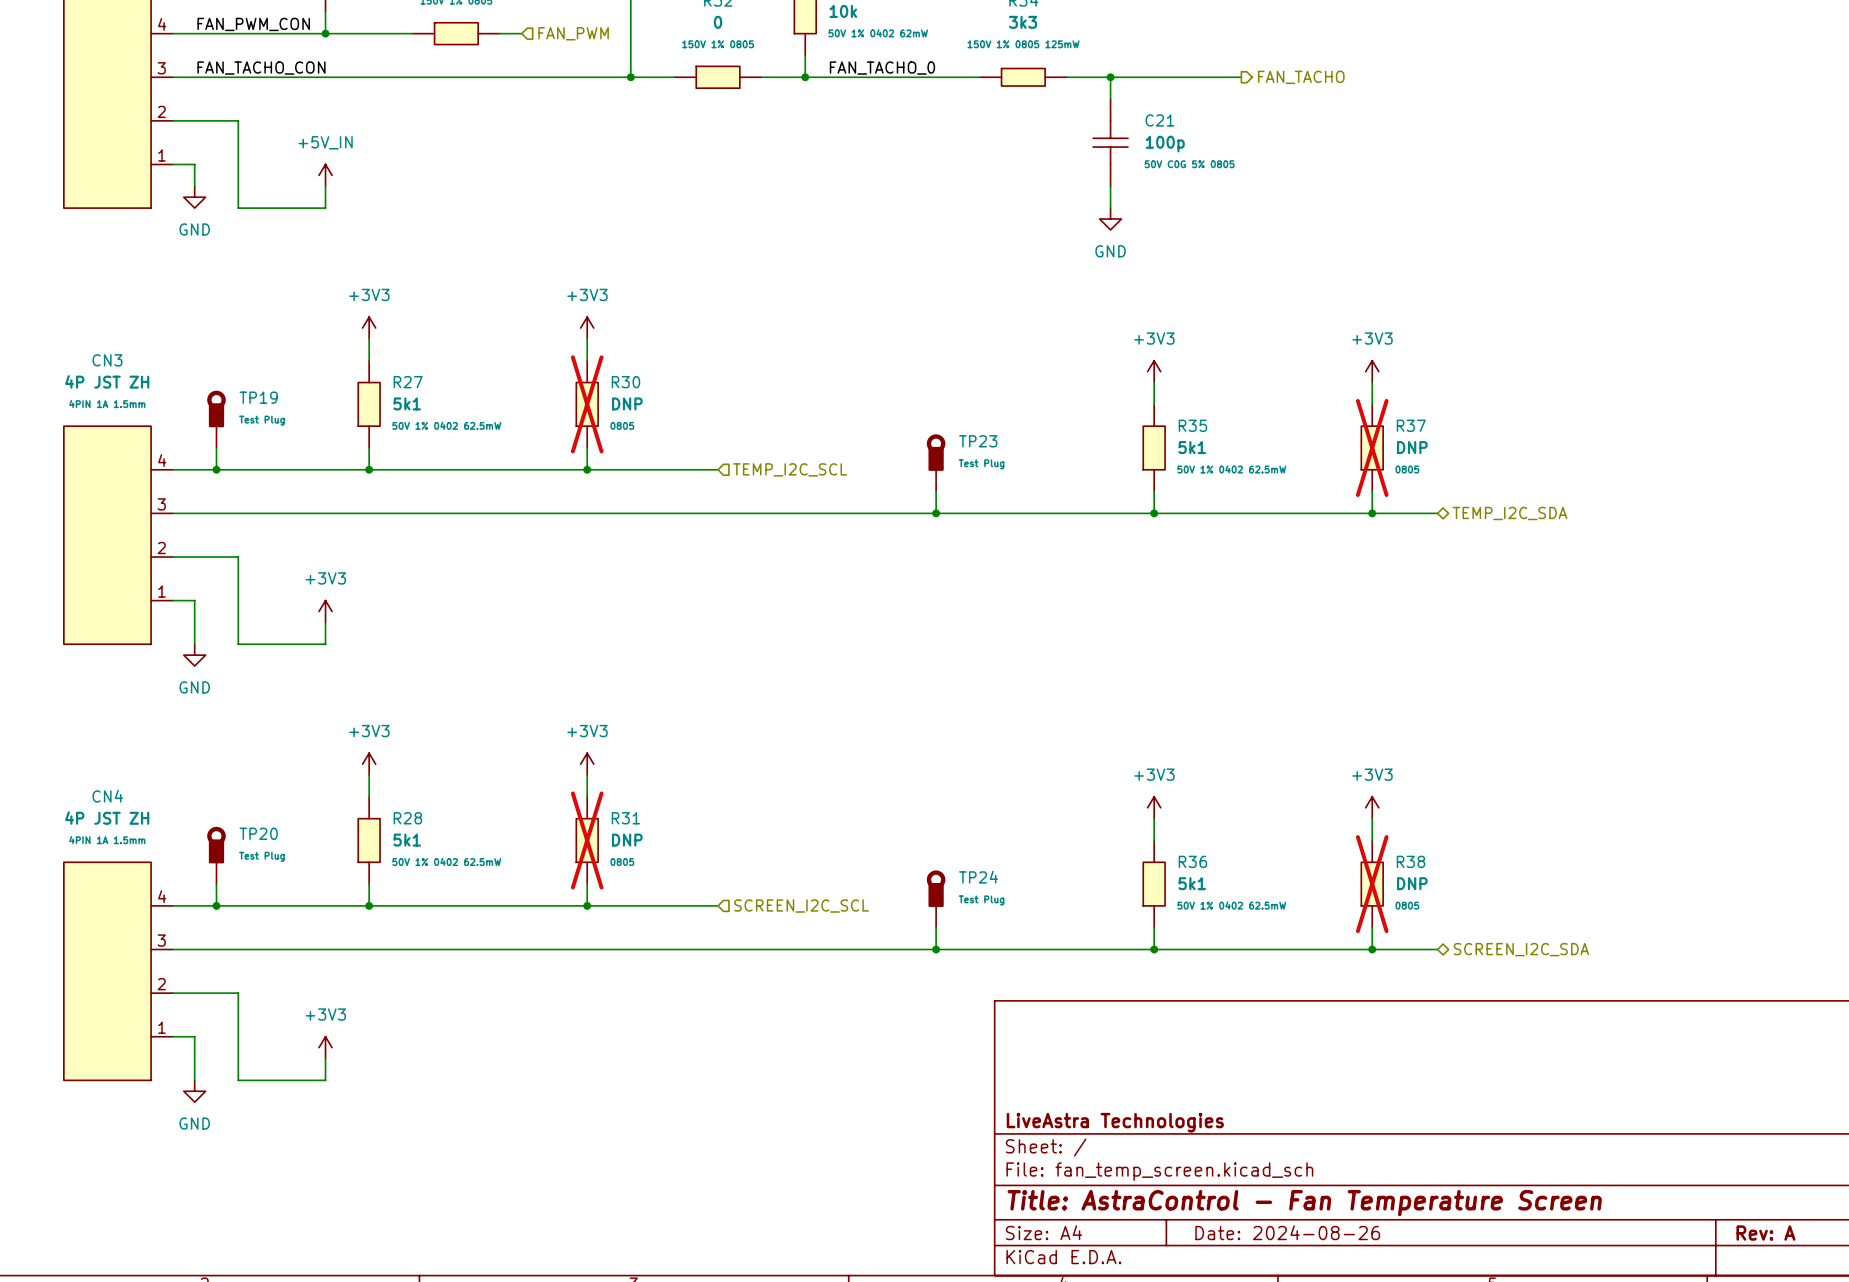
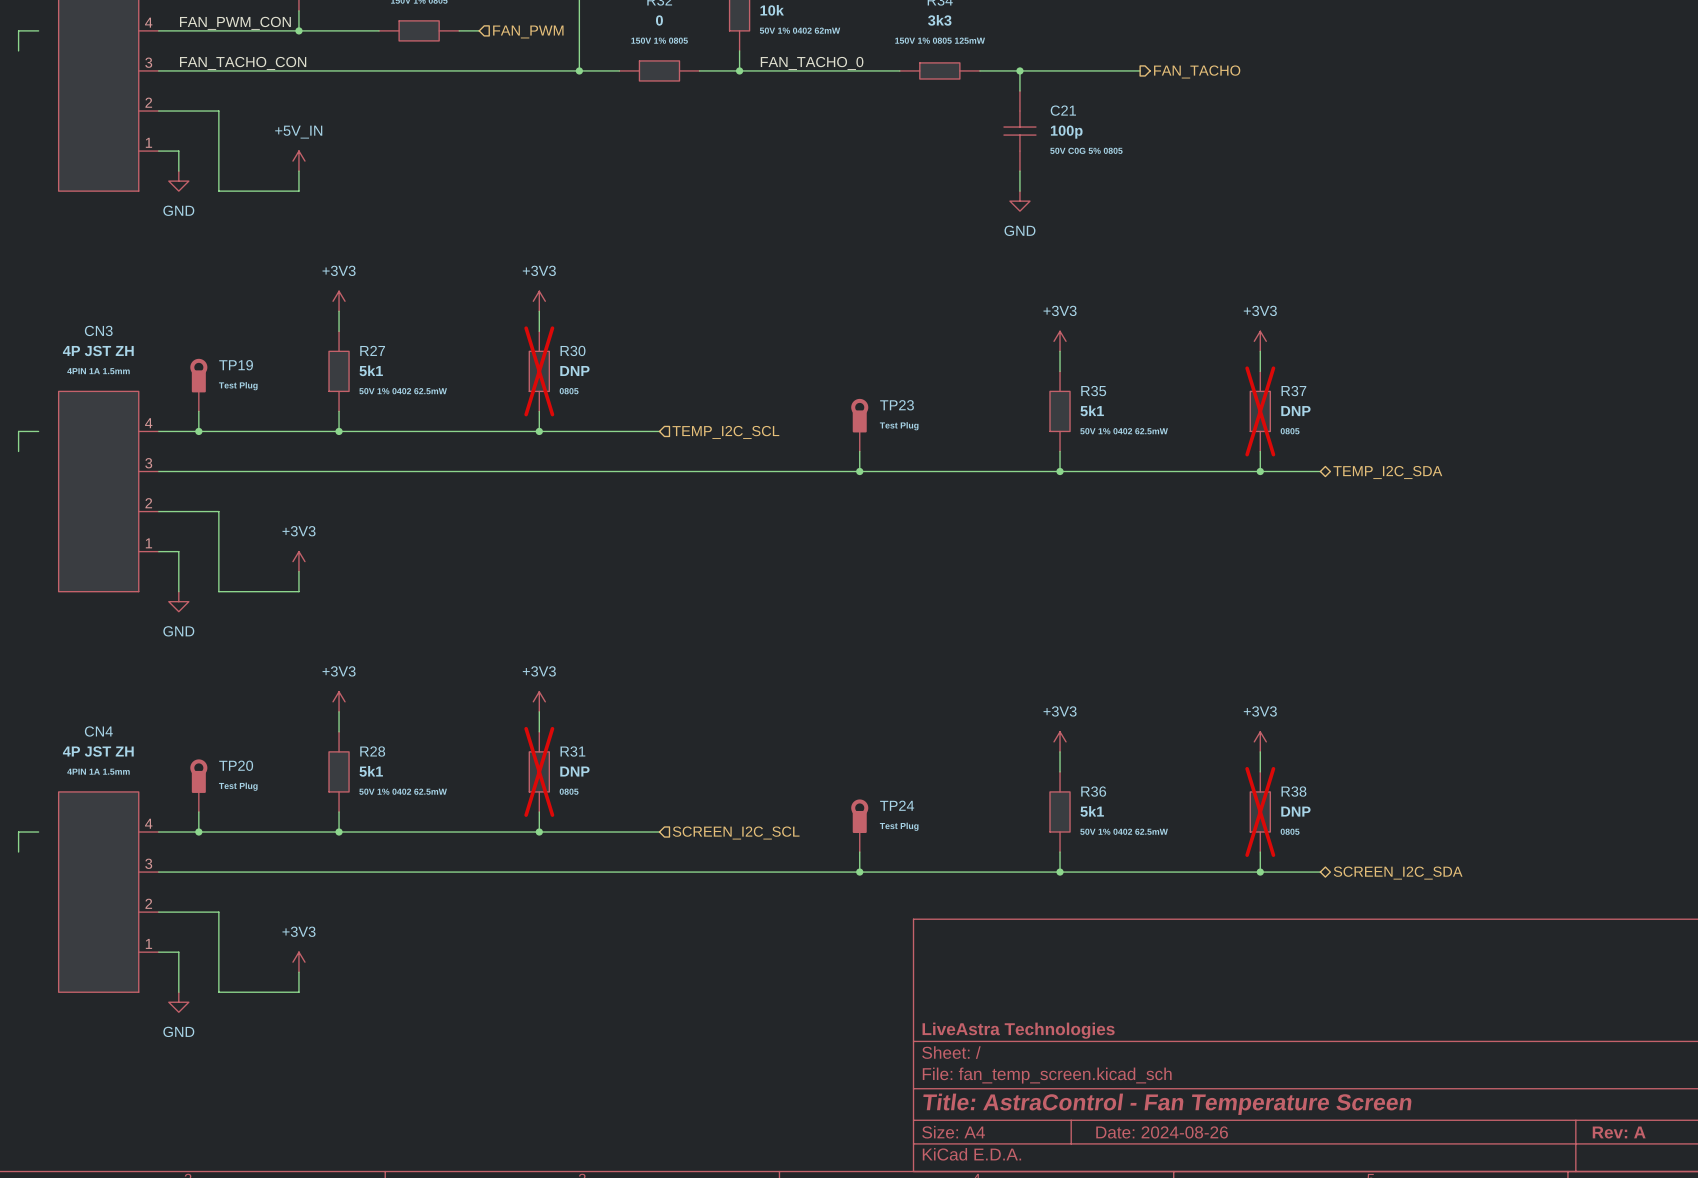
wire: none -> (38, 30) (18, 30) (18, 50)
wire: none -> (38, 431) (18, 431) (18, 451)
wire: none -> (38, 832) (18, 832) (18, 852)

